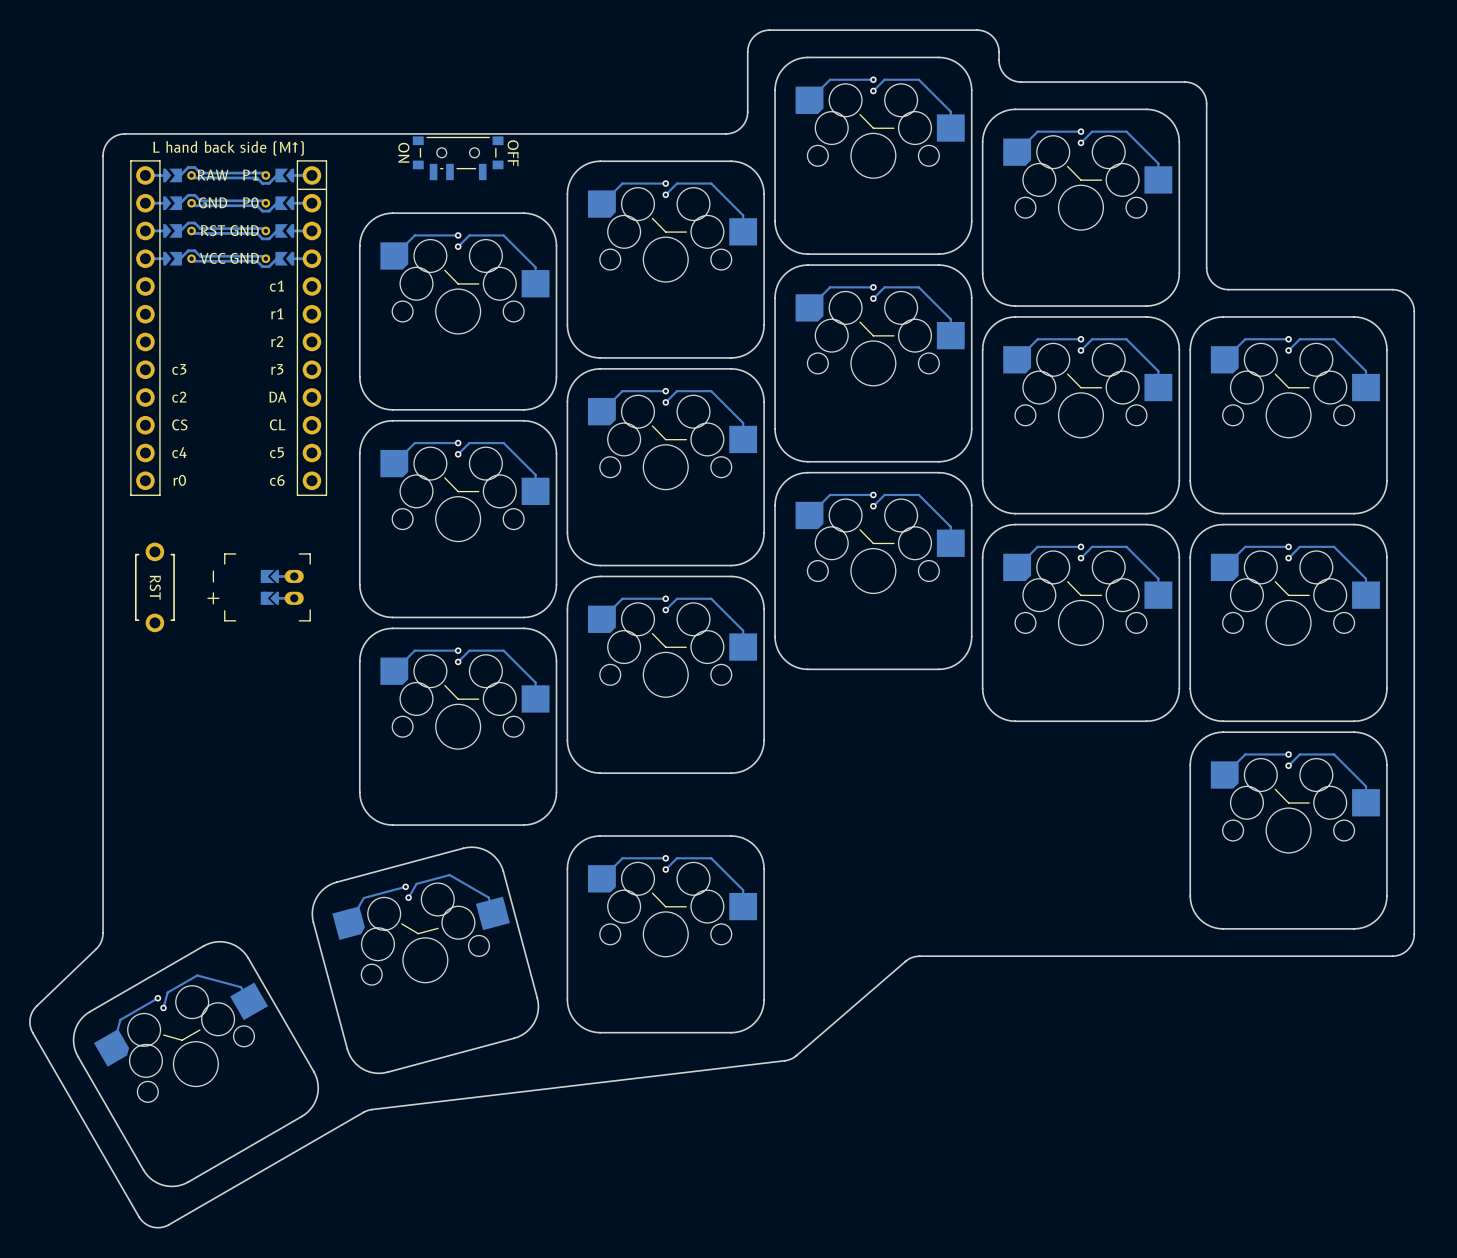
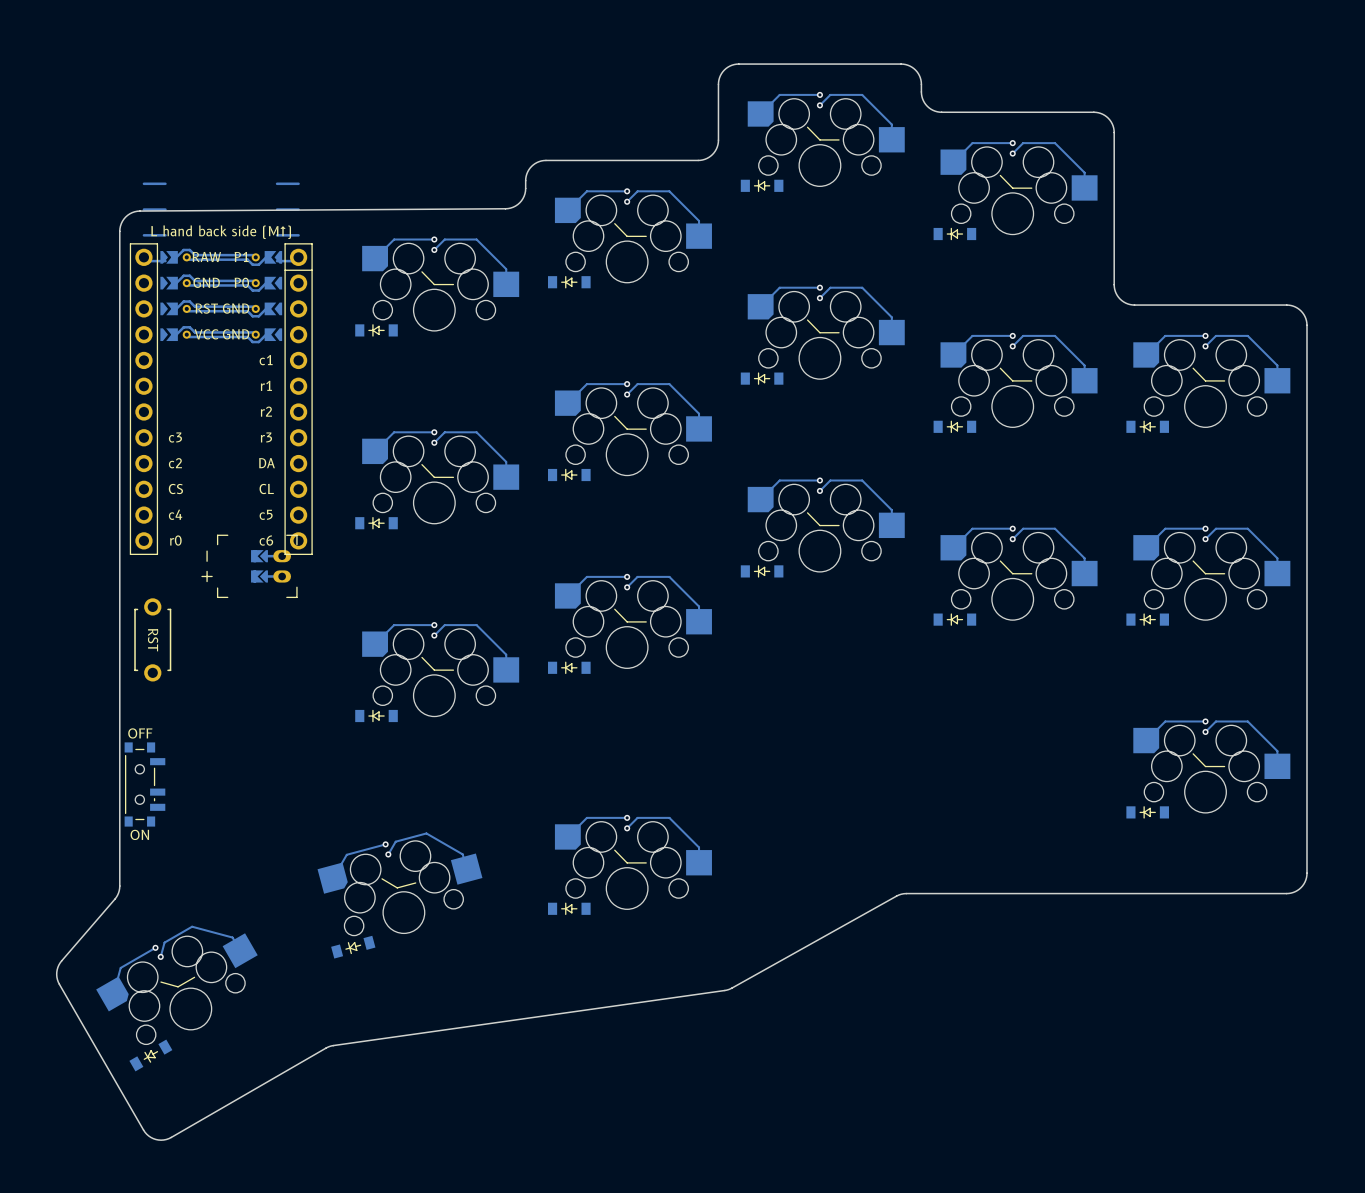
board edge: (977, 30) (769, 30) (760, 32) (752, 38) (747, 49) (746, 119) (739, 129) (728, 133) (124, 133) (113, 137) (106, 144) (103, 155) (102, 935) (97, 947) (34, 1008) (30, 1016) (29, 1023) (32, 1032) (138, 1216) (144, 1223) (157, 1227) (168, 1224) (369, 1109) (788, 1059) (796, 1055) (905, 961) (914, 956) (1392, 956) (1404, 952) (1410, 945) (1414, 934) (1414, 311) (1412, 302) (1404, 292) (1394, 289) (1228, 289) (1216, 286) (1209, 279) (1206, 270) (1206, 103) (1204, 94) (1200, 88) (1194, 84) (1184, 82) (1016, 81) (1007, 77) (1001, 69) (998, 47) (994, 38) (986, 32) (977, 30) -> (901, 64) (909, 66) (916, 71) (920, 79) (923, 100) (929, 107) (937, 111) (1093, 112) (1102, 114) (1108, 118) (1112, 123) (1114, 132) (1114, 287) (1117, 295) (1123, 301) (1134, 305) (1288, 305) (1297, 308) (1304, 316) (1306, 325) (1306, 873) (1303, 884) (1297, 890) (1286, 893) (901, 894) (728, 989) (331, 1045) (168, 1138) (158, 1140) (148, 1135) (59, 984) (56, 974) (60, 962) (114, 899) (119, 888) (119, 231) (123, 219) (132, 212) (139, 211) (508, 208) (515, 206) (521, 200) (524, 193) (527, 171) (533, 164) (541, 160) (698, 160) (708, 157) (715, 150) (718, 142) (718, 79) (722, 71) (732, 65) (901, 64)
board edge: (938, 57) (803, 57) (791, 61) (781, 70) (777, 77) (775, 90) (775, 221) (779, 237) (787, 247) (795, 251) (807, 254) (938, 254) (955, 249) (964, 241) (969, 233) (971, 221) (971, 85) (967, 73) (962, 67) (951, 59) (938, 57) -> none
board edge: (1146, 109) (1011, 109) (999, 113) (989, 122) (985, 129) (982, 142) (982, 273) (985, 285) (995, 299) (1006, 304) (1015, 306) (1146, 306) (1162, 301) (1172, 293) (1178, 281) (1179, 273) (1179, 137) (1174, 125) (1169, 118) (1159, 111) (1146, 109) -> none
part: (458, 158) -> none
board edge: (731, 161) (595, 161) (583, 165) (574, 174) (568, 185) (567, 194) (567, 325) (571, 341) (580, 351) (591, 356) (600, 357) (731, 357) (743, 355) (757, 345) (762, 333) (764, 325) (763, 189) (759, 177) (751, 168) (739, 162) (731, 161) -> none
track: (263, 173) (200, 173) (194, 167) (188, 167) (180, 175) (176, 175) -> (253, 255) (194, 255) (189, 250) (183, 250) (176, 257) (172, 257)
track: (280, 175) (277, 175) (269, 183) (262, 183) (257, 177) (194, 177) -> (269, 257) (266, 257) (258, 264) (252, 264) (247, 259) (189, 259)
part: none -> (762, 185)
track: (263, 200) (200, 200) (194, 195) (188, 195) (180, 203) (176, 203) -> (253, 280) (194, 280) (189, 275) (183, 275) (176, 283) (172, 283)
track: (280, 203) (277, 203) (269, 211) (262, 211) (257, 205) (194, 205) -> (269, 283) (266, 283) (258, 290) (252, 290) (247, 285) (189, 285)
board edge: (523, 213) (388, 213) (376, 217) (366, 225) (362, 233) (359, 245) (359, 377) (364, 393) (372, 403) (384, 408) (392, 409) (523, 409) (540, 405) (549, 397) (555, 385) (556, 377) (556, 241) (552, 229) (546, 222) (536, 215) (523, 213) -> none
track: (263, 228) (200, 228) (194, 223) (188, 223) (180, 230) (176, 230) -> (253, 306) (194, 306) (189, 301) (183, 301) (176, 308) (172, 308)
part: none -> (954, 234)
track: (280, 230) (277, 230) (269, 238) (262, 238) (257, 233) (194, 233) -> (269, 308) (266, 308) (258, 316) (252, 316) (247, 311) (189, 311)
track: (263, 256) (200, 256) (194, 250) (188, 250) (180, 258) (176, 258) -> (253, 332) (194, 332) (189, 327) (183, 327) (176, 334) (172, 334)
track: (280, 258) (277, 258) (269, 266) (262, 266) (257, 261) (194, 261) -> (269, 334) (266, 334) (258, 342) (252, 342) (247, 337) (189, 337)
board edge: (938, 265) (803, 265) (791, 269) (781, 277) (776, 289) (775, 297) (775, 428) (779, 445) (787, 454) (795, 459) (807, 461) (938, 461) (955, 457) (964, 448) (969, 441) (971, 428) (971, 293) (967, 281) (962, 274) (951, 267) (938, 265) -> none
part: none -> (569, 282)
board edge: (1146, 316) (1011, 317) (999, 321) (989, 329) (983, 341) (982, 349) (982, 480) (987, 497) (995, 506) (1006, 512) (1015, 513) (1146, 513) (1162, 509) (1172, 500) (1178, 489) (1179, 480) (1179, 345) (1174, 333) (1166, 323) (1159, 319) (1146, 316) -> none
board edge: (1354, 316) (1218, 317) (1206, 321) (1197, 329) (1192, 337) (1190, 349) (1190, 480) (1194, 497) (1203, 506) (1214, 512) (1223, 513) (1354, 513) (1370, 509) (1380, 500) (1385, 489) (1386, 480) (1386, 345) (1384, 337) (1377, 326) (1366, 319) (1354, 316) -> none
part position: (228, 328) -> (221, 399)
part: none -> (376, 330)
board edge: (731, 368) (595, 369) (583, 373) (574, 381) (568, 393) (567, 401) (567, 532) (571, 549) (580, 558) (591, 564) (600, 565) (731, 565) (743, 563) (757, 552) (761, 545) (764, 532) (763, 397) (759, 385) (751, 375) (743, 371) (731, 368) -> none
part: none -> (762, 378)
board edge: (523, 420) (388, 421) (376, 425) (366, 433) (360, 445) (359, 453) (359, 584) (364, 601) (372, 610) (380, 614) (392, 617) (523, 617) (540, 613) (549, 604) (555, 593) (556, 584) (556, 449) (554, 441) (546, 430) (536, 423) (523, 420) -> none
part: none -> (954, 426)
part: none -> (1147, 426)
board edge: (938, 472) (803, 472) (791, 477) (781, 485) (777, 492) (775, 505) (775, 636) (777, 649) (787, 662) (799, 668) (807, 669) (938, 669) (951, 666) (964, 656) (969, 649) (971, 636) (971, 501) (967, 489) (962, 482) (951, 475) (938, 472) -> none
part: none -> (569, 475)
board edge: (1146, 524) (1011, 524) (999, 528) (989, 537) (985, 544) (982, 557) (982, 688) (987, 704) (995, 714) (1002, 718) (1015, 721) (1146, 721) (1162, 716) (1172, 708) (1176, 701) (1179, 688) (1179, 553) (1174, 540) (1169, 534) (1159, 527) (1146, 524) -> none
board edge: (1354, 524) (1218, 524) (1206, 528) (1197, 537) (1192, 544) (1190, 557) (1190, 688) (1192, 701) (1203, 714) (1210, 718) (1223, 721) (1354, 721) (1370, 716) (1380, 708) (1385, 696) (1386, 688) (1386, 553) (1382, 540) (1374, 531) (1362, 525) (1354, 524) -> none
part: none -> (376, 523)
board edge: (731, 576) (595, 576) (583, 580) (574, 589) (568, 600) (567, 609) (567, 740) (571, 756) (580, 766) (587, 770) (600, 773) (731, 773) (743, 770) (757, 760) (761, 752) (764, 740) (763, 604) (761, 596) (754, 586) (743, 578) (731, 576) -> none
part position: (154, 587) -> (152, 639)
part: none -> (762, 571)
board edge: (523, 628) (388, 628) (376, 632) (366, 641) (362, 648) (359, 661) (359, 792) (364, 808) (372, 818) (380, 822) (392, 825) (523, 825) (540, 820) (549, 812) (554, 804) (556, 792) (556, 656) (554, 648) (546, 637) (536, 630) (523, 628) -> none
part: none -> (954, 619)
part: none -> (1147, 619)
part: none -> (569, 667)
board edge: (1354, 732) (1218, 732) (1206, 736) (1197, 745) (1191, 756) (1190, 764) (1190, 896) (1192, 908) (1203, 922) (1210, 926) (1223, 928) (1354, 928) (1370, 924) (1380, 916) (1385, 904) (1386, 896) (1386, 760) (1382, 748) (1377, 741) (1366, 734) (1354, 732) -> none
part: none -> (376, 716)
part: none -> (144, 784)
board edge: (731, 835) (595, 836) (583, 840) (574, 848) (569, 856) (567, 868) (567, 999) (571, 1016) (580, 1025) (591, 1031) (600, 1032) (731, 1032) (747, 1028) (757, 1019) (761, 1012) (764, 999) (763, 864) (759, 852) (751, 842) (743, 838) (731, 835) -> none
board edge: (463, 848) (332, 883) (321, 890) (314, 901) (312, 909) (313, 922) (347, 1049) (355, 1063) (366, 1070) (374, 1073) (387, 1072) (514, 1038) (528, 1029) (535, 1019) (538, 1010) (537, 998) (502, 867) (494, 856) (484, 849) (471, 847) (463, 848) -> none
part: none -> (1147, 812)
board edge: (203, 946) (86, 1013) (79, 1021) (73, 1035) (74, 1046) (77, 1056) (143, 1170) (153, 1180) (167, 1186) (178, 1185) (188, 1182) (301, 1116) (312, 1106) (317, 1092) (317, 1081) (313, 1071) (246, 955) (238, 947) (224, 942) (213, 942) (203, 946) -> none
part: none -> (569, 908)
part: none -> (353, 947)
part: none -> (150, 1055)

